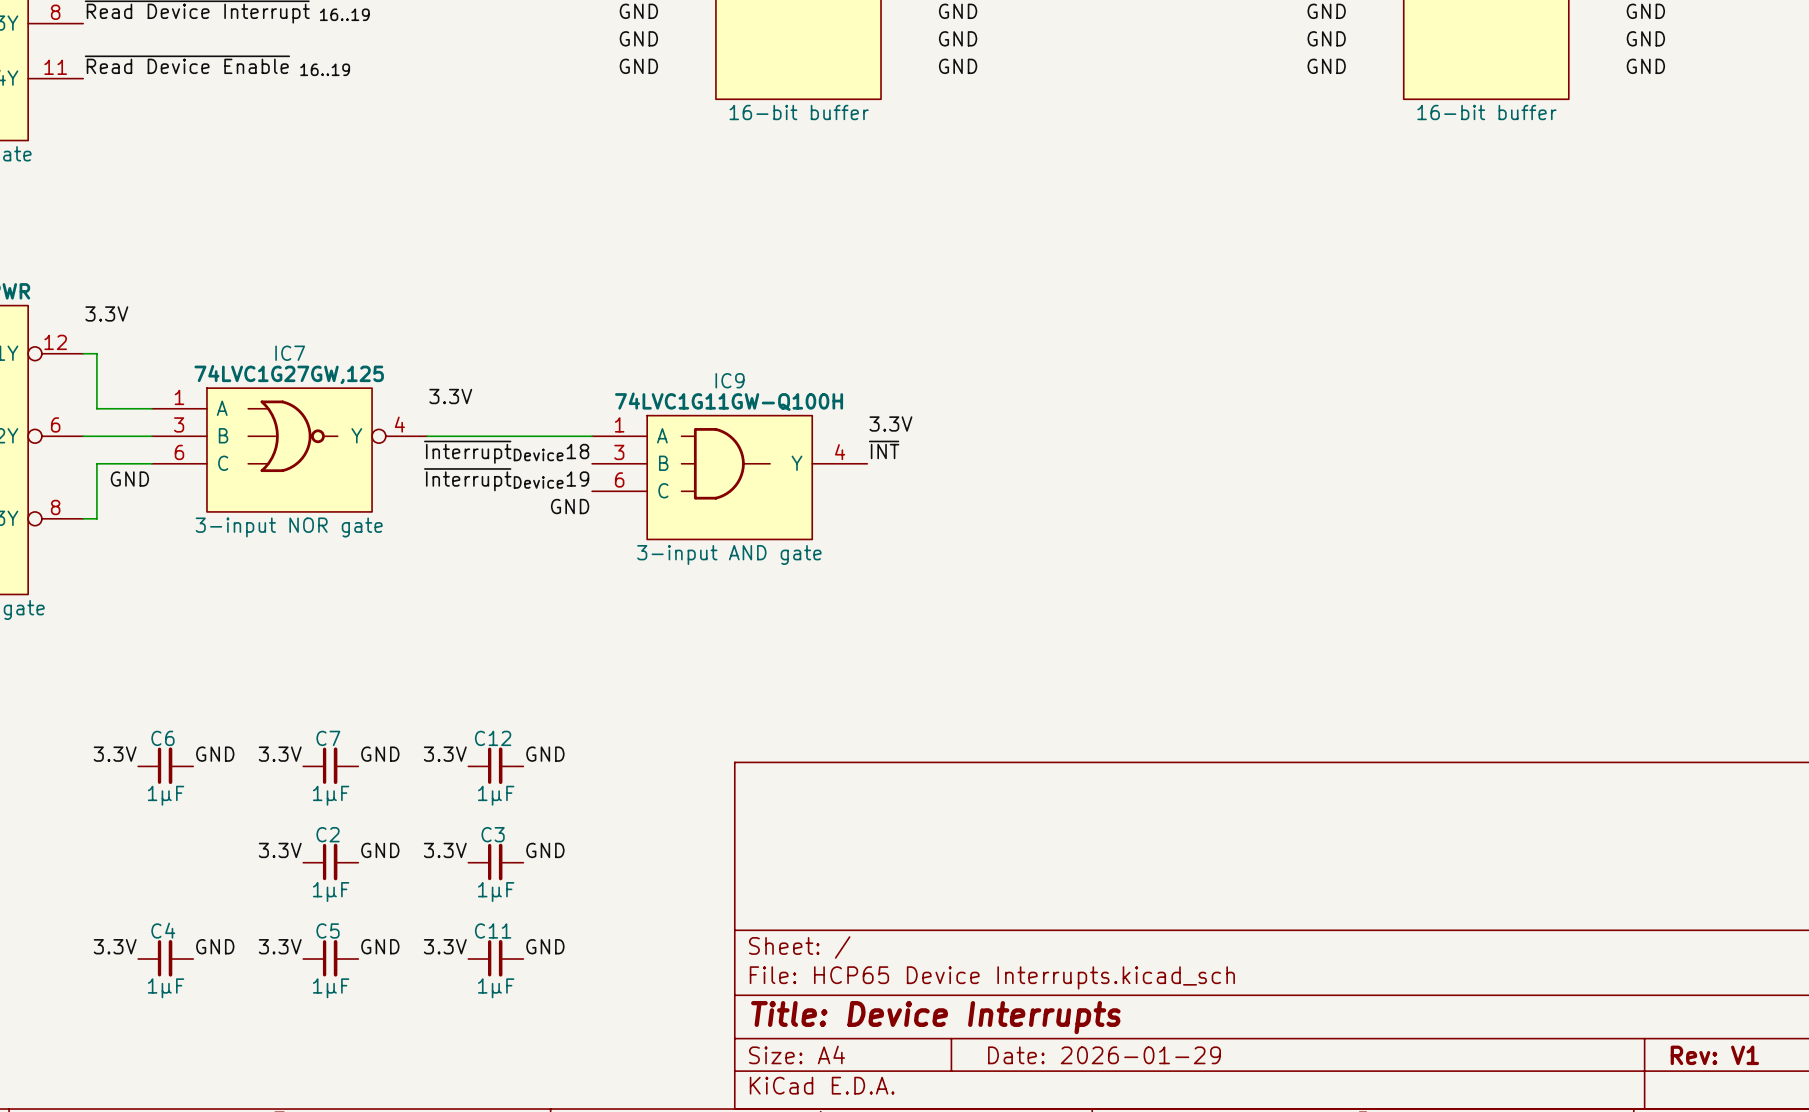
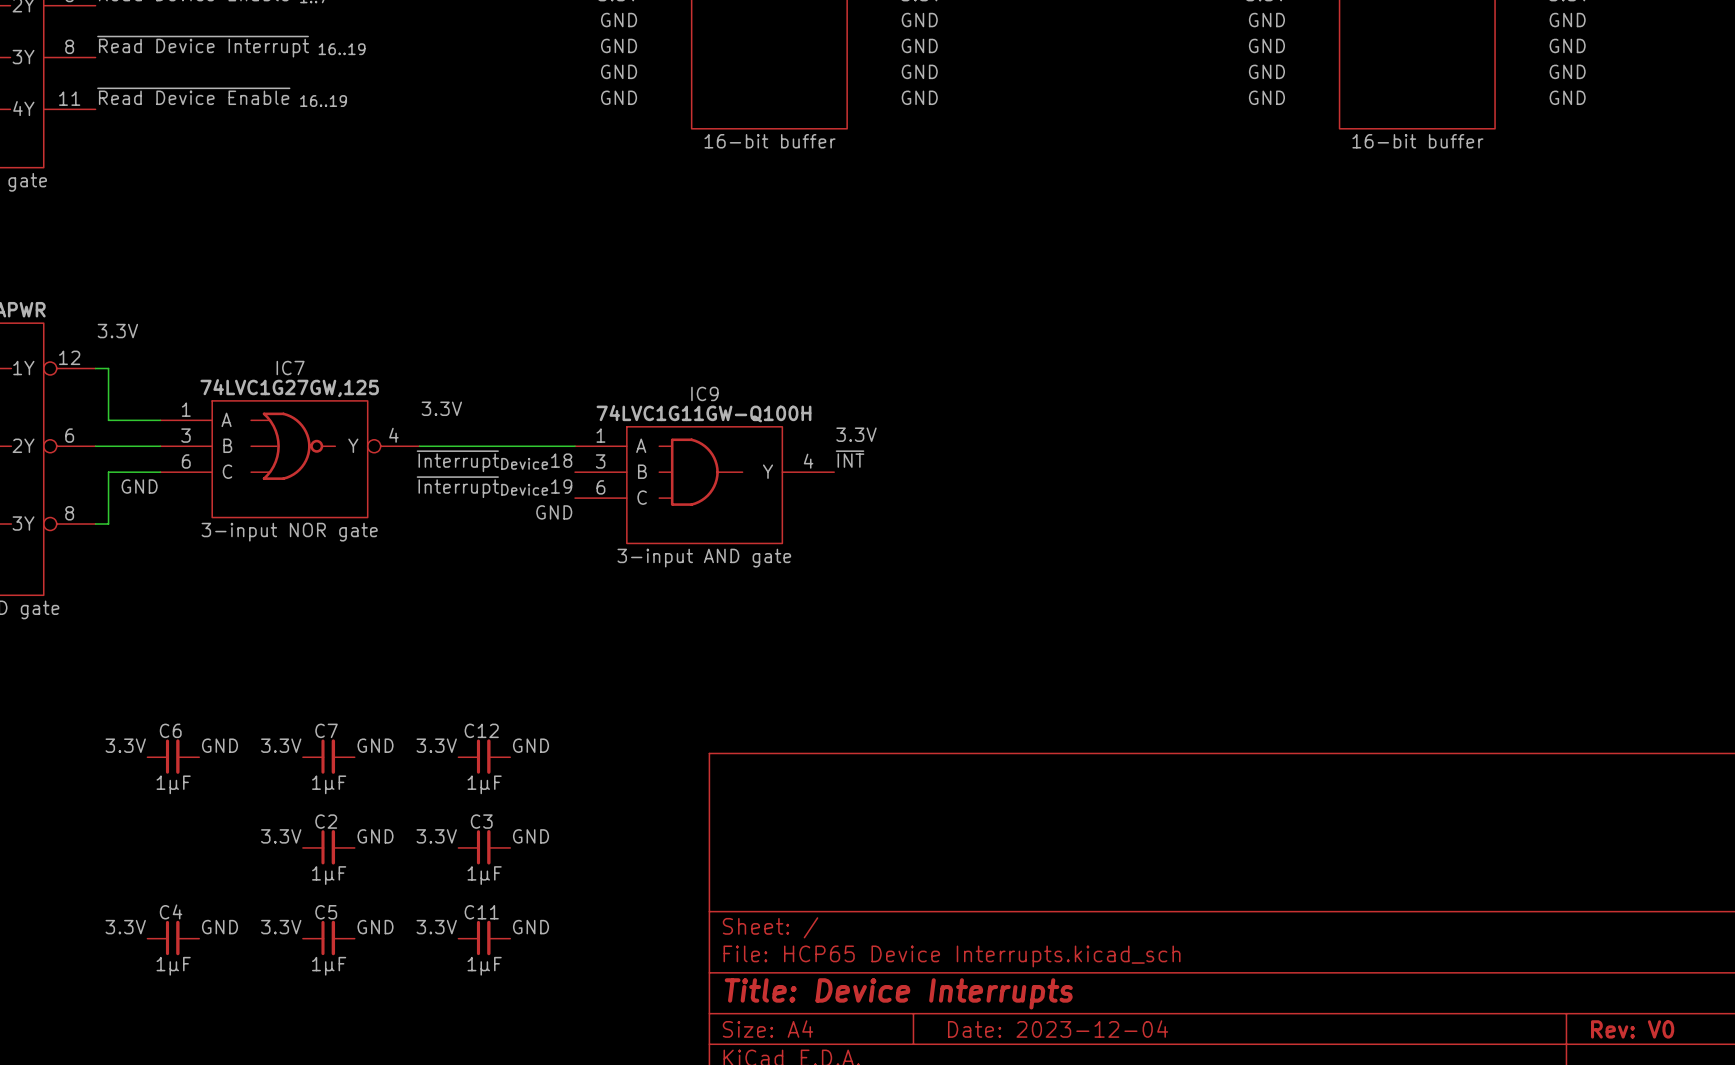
title block: Date: 2026-01-29 (1104, 1055) -> Date: 2023-12-04 (1058, 1029)
title block: Rev: V1 (1714, 1055) -> Rev: V0 (1632, 1029)

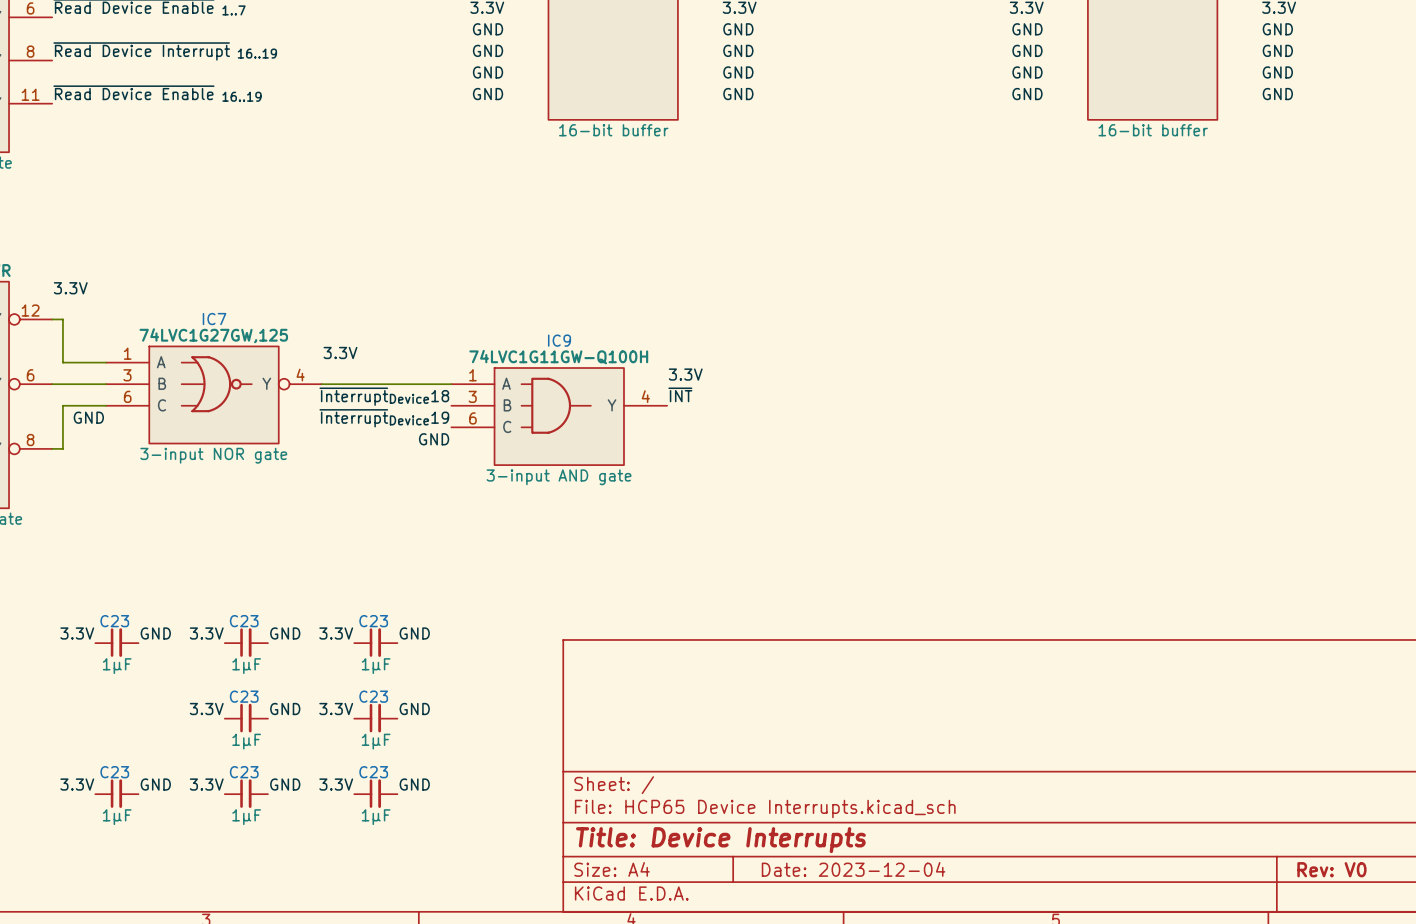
C6 name: C6 (170, 730) -> C23 (114, 621)
C7 name: C7 (326, 730) -> C23 (244, 621)
C12 name: C12 (481, 730) -> C23 (373, 621)
C2 name: C2 (326, 821) -> C23 (244, 696)
C3 name: C3 (481, 821) -> C23 (373, 696)
C4 name: C4 (171, 911) -> C23 (114, 772)
C5 name: C5 (326, 912) -> C23 (244, 772)
C11 name: C11 (481, 912) -> C23 (373, 772)

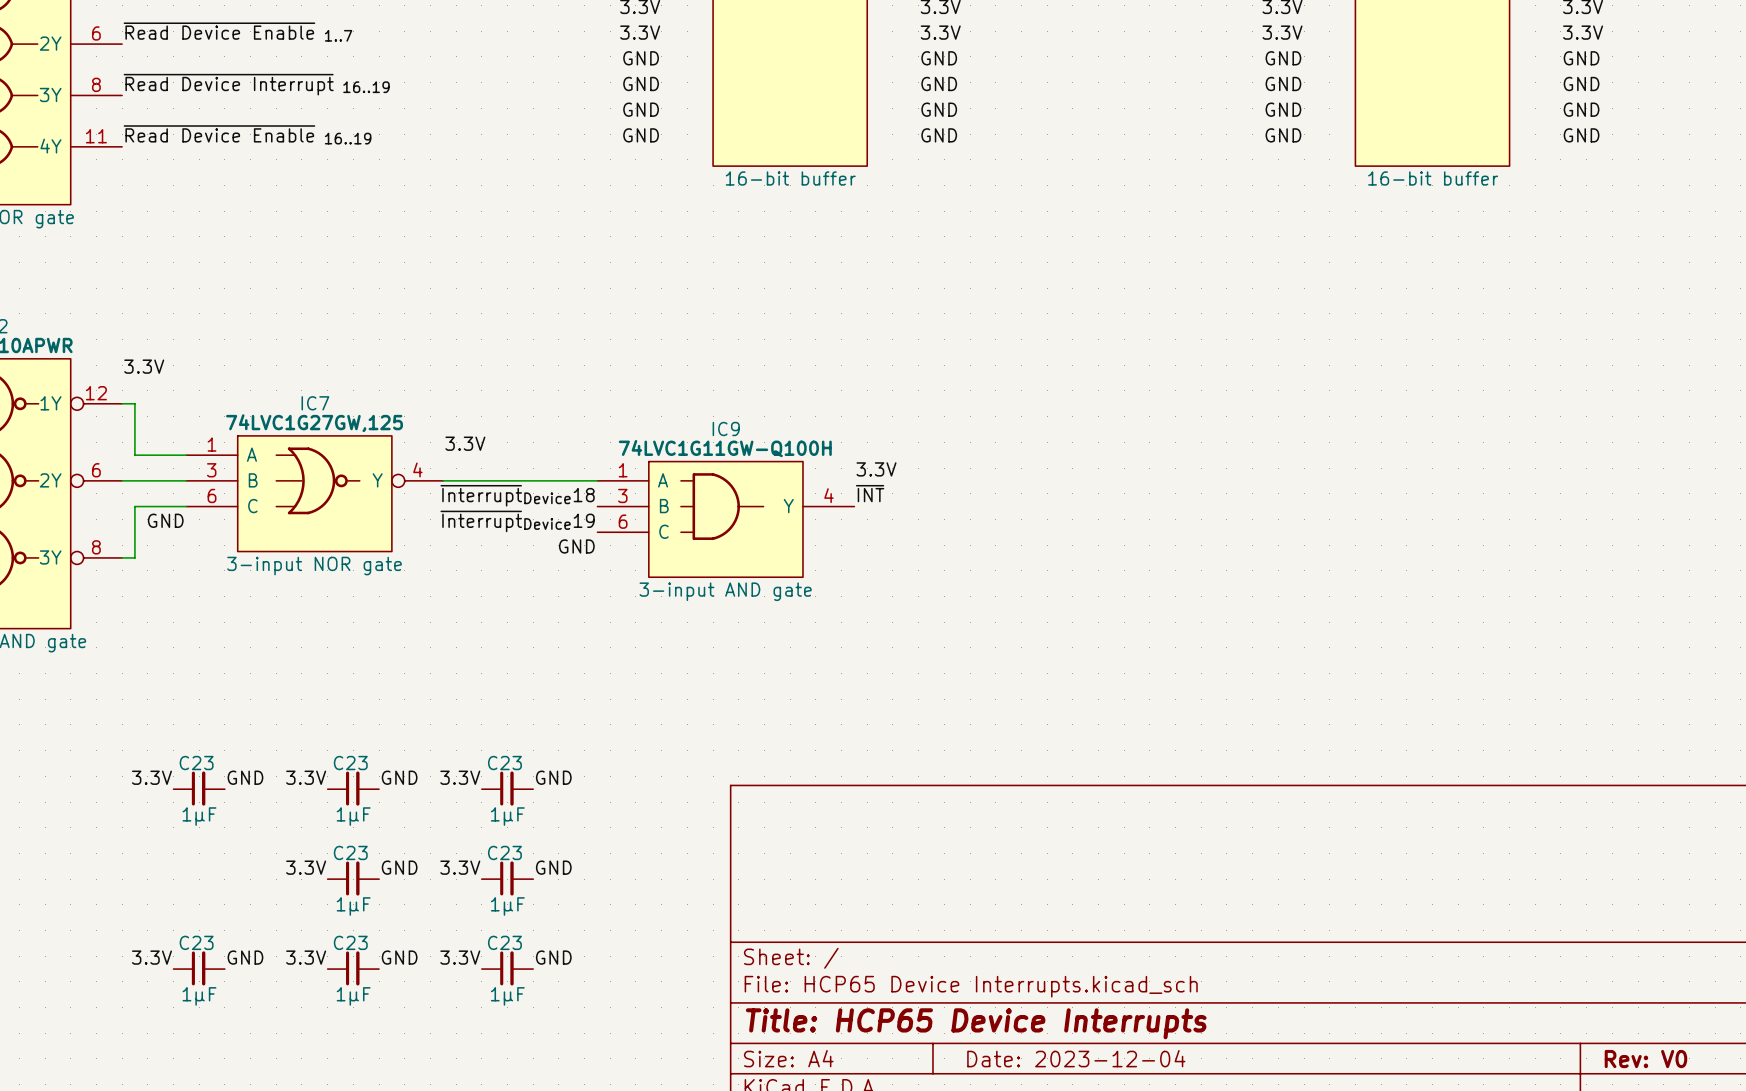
title block: Title: Device Interrupts (720, 840) -> Title: HCP65 Device Interrupts (976, 1023)

